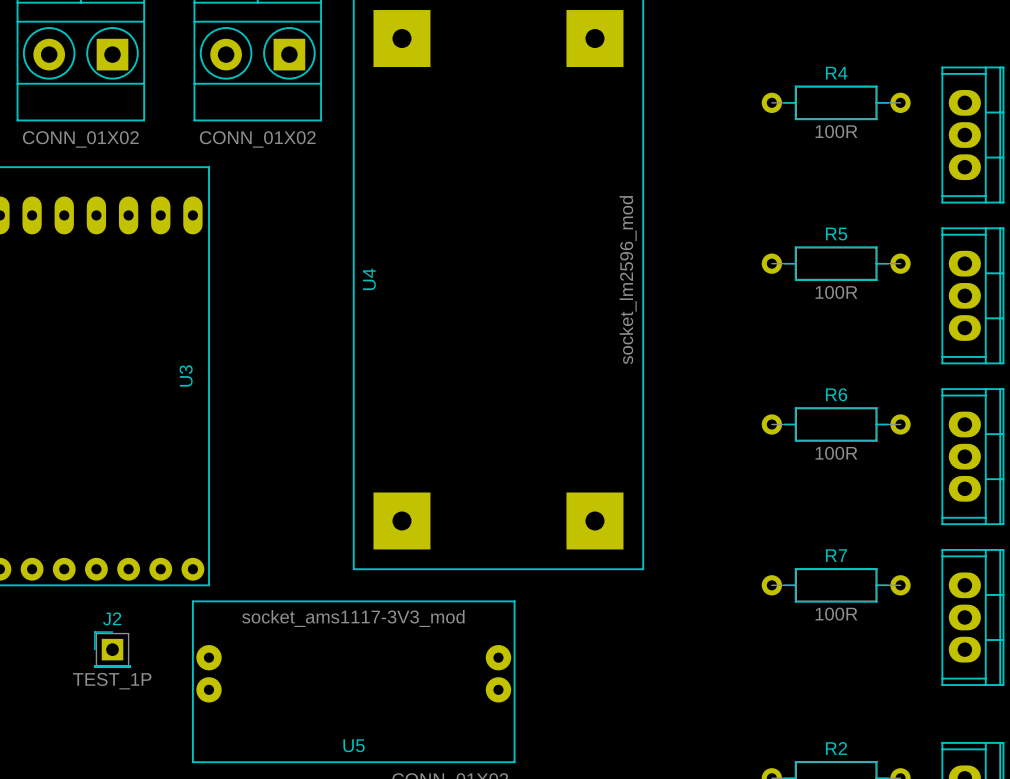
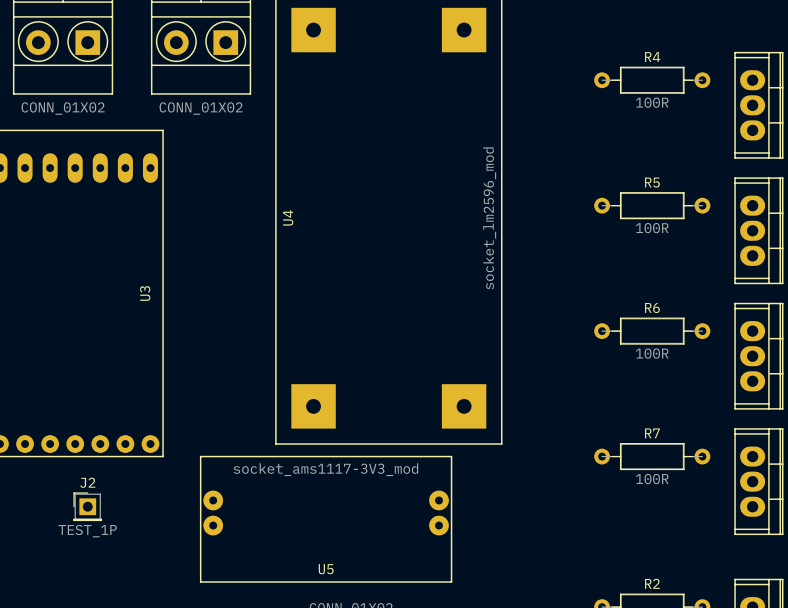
U5 position: (353, 681) -> (326, 519)

